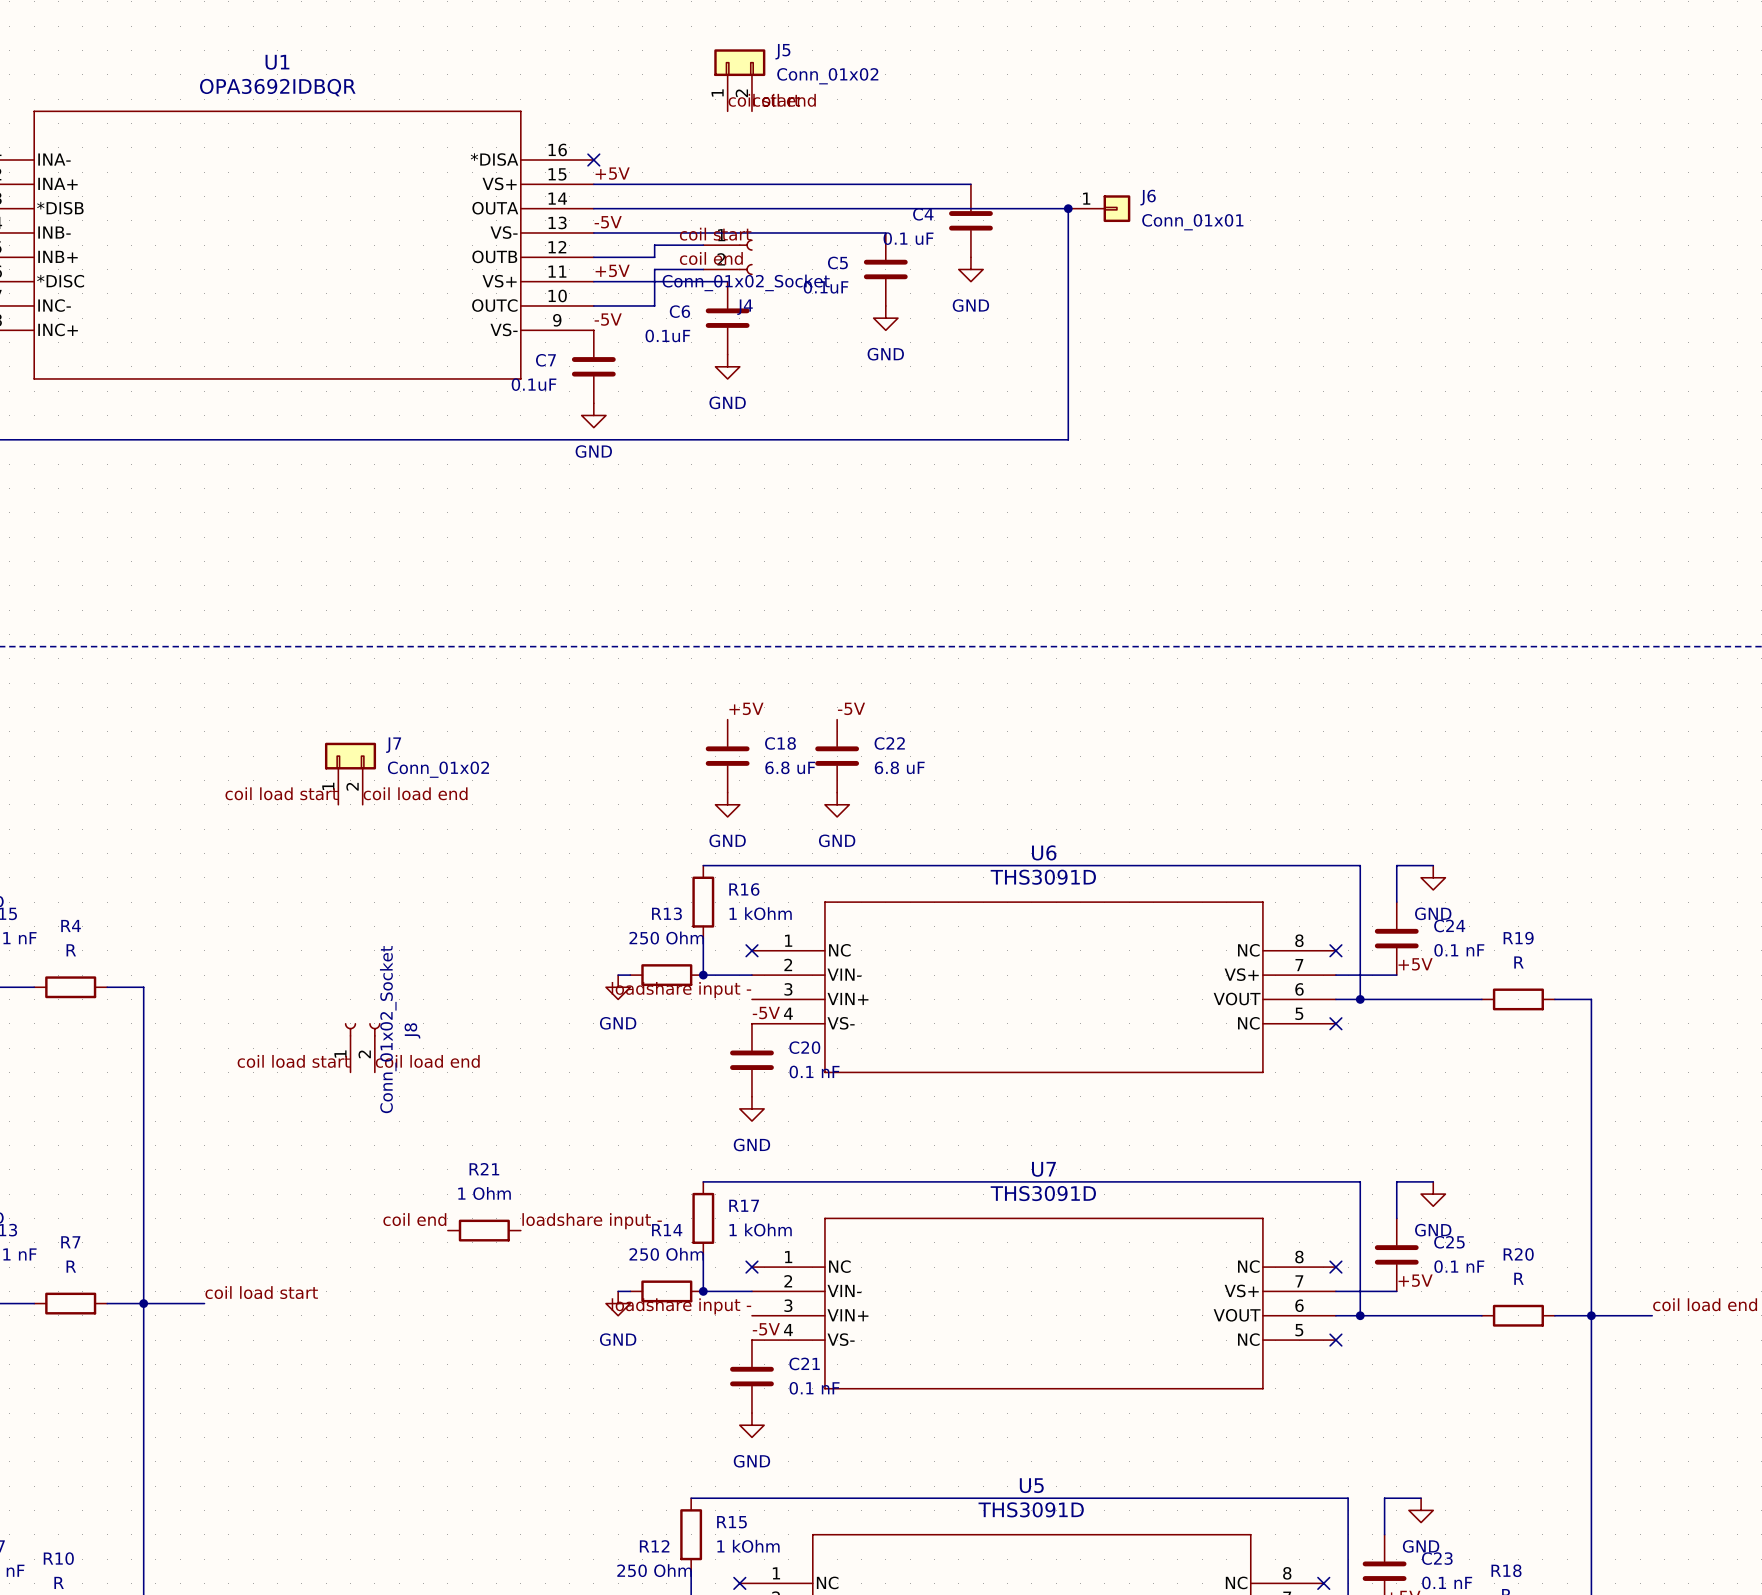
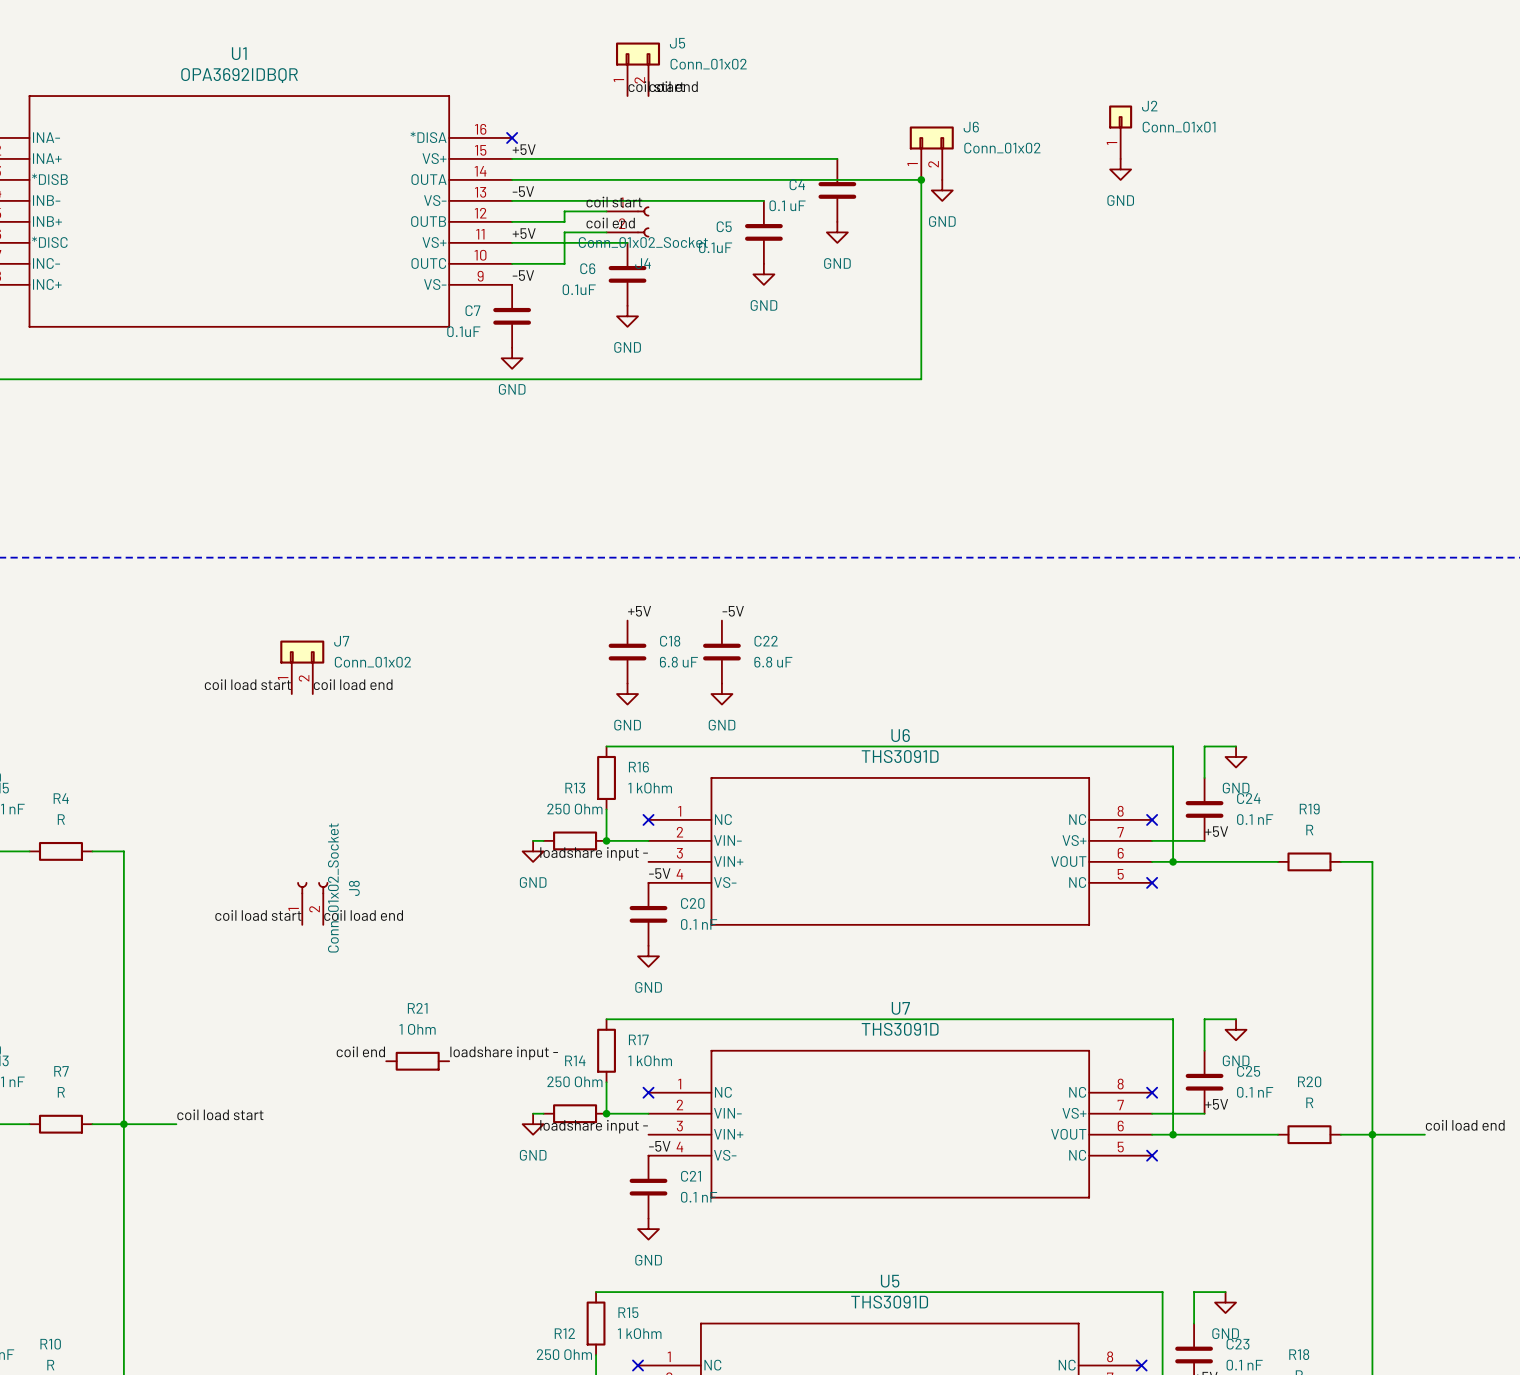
J2: none -> Conn_01x01 (1120, 132)
J6 symbol: [1068, 195, 1131, 223] -> [909, 126, 954, 180]
power symbol: none -> GND (1120, 169)
power symbol: none -> GND (942, 190)
J6 value: Conn_01x01 (1192, 222) -> Conn_01x02 (1002, 148)

